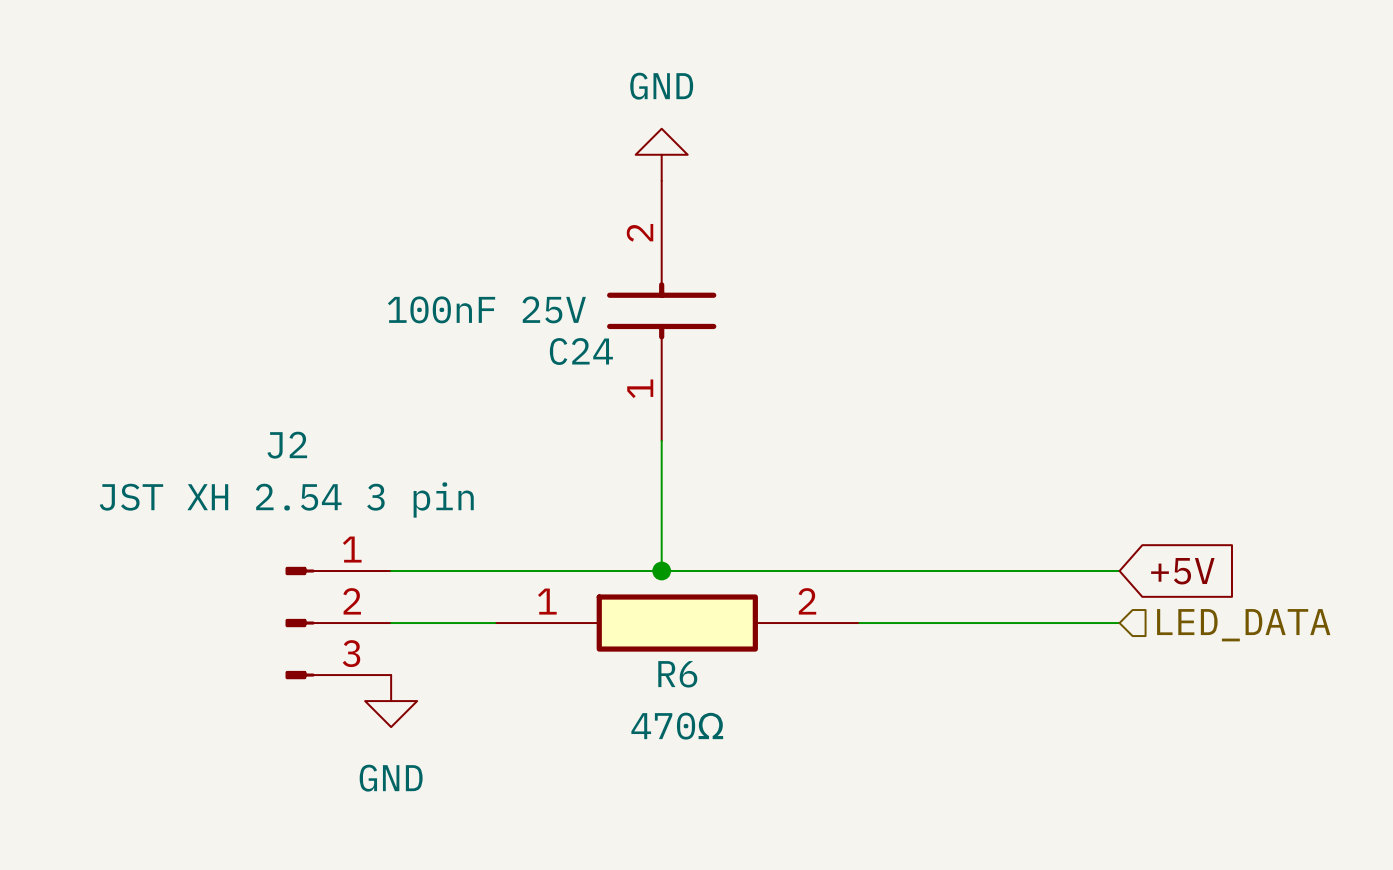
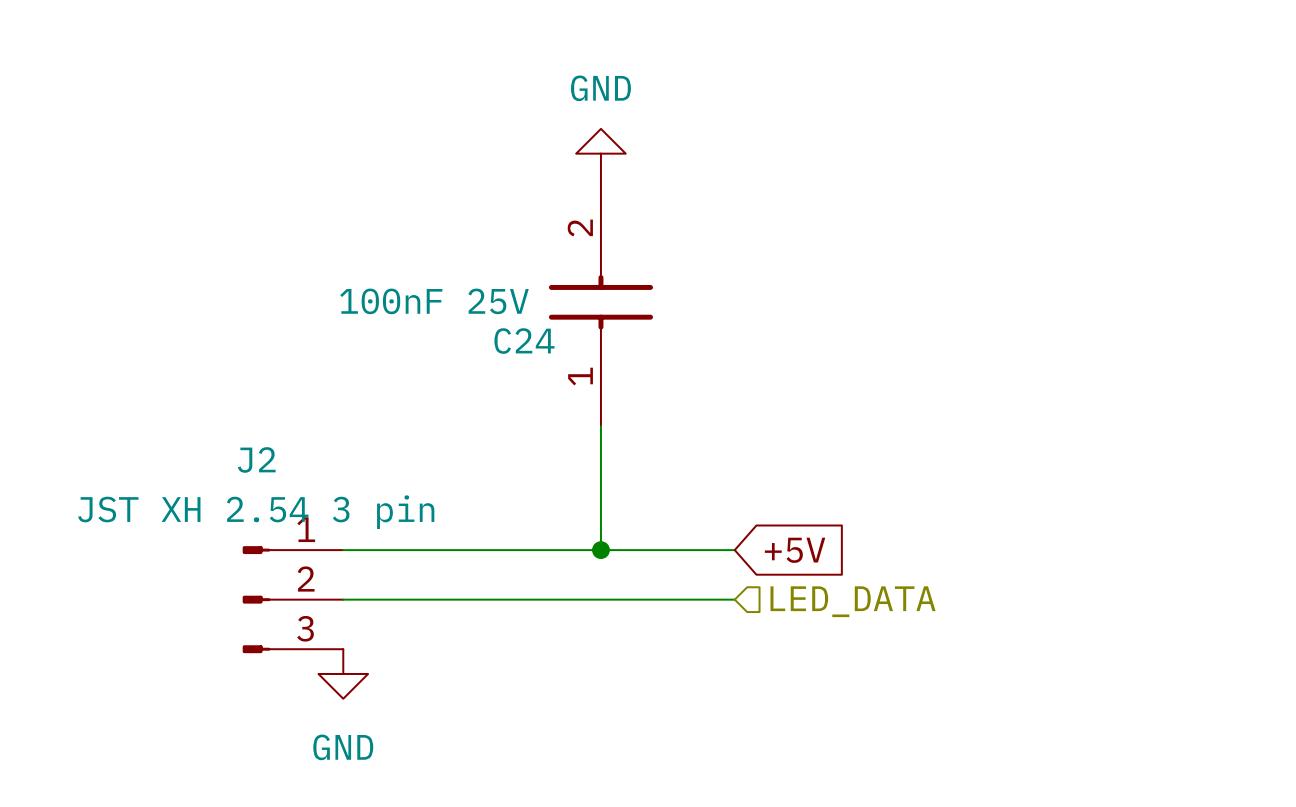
J2 name position: J2 (287, 445) -> J2 (256, 459)
J2 value position: JST XH 2.54 3 pin (286, 499) -> JST XH 2.54 3 pin (256, 512)
wire: (802, 571) (1119, 571) -> none
global label position: +5V (1182, 571) -> +5V (795, 550)
R6: 470Ω (677, 623) -> none
wire: (859, 623) (1119, 623) -> none
hierarchical label position: LED_DATA (1243, 625) -> LED_DATA (853, 601)

